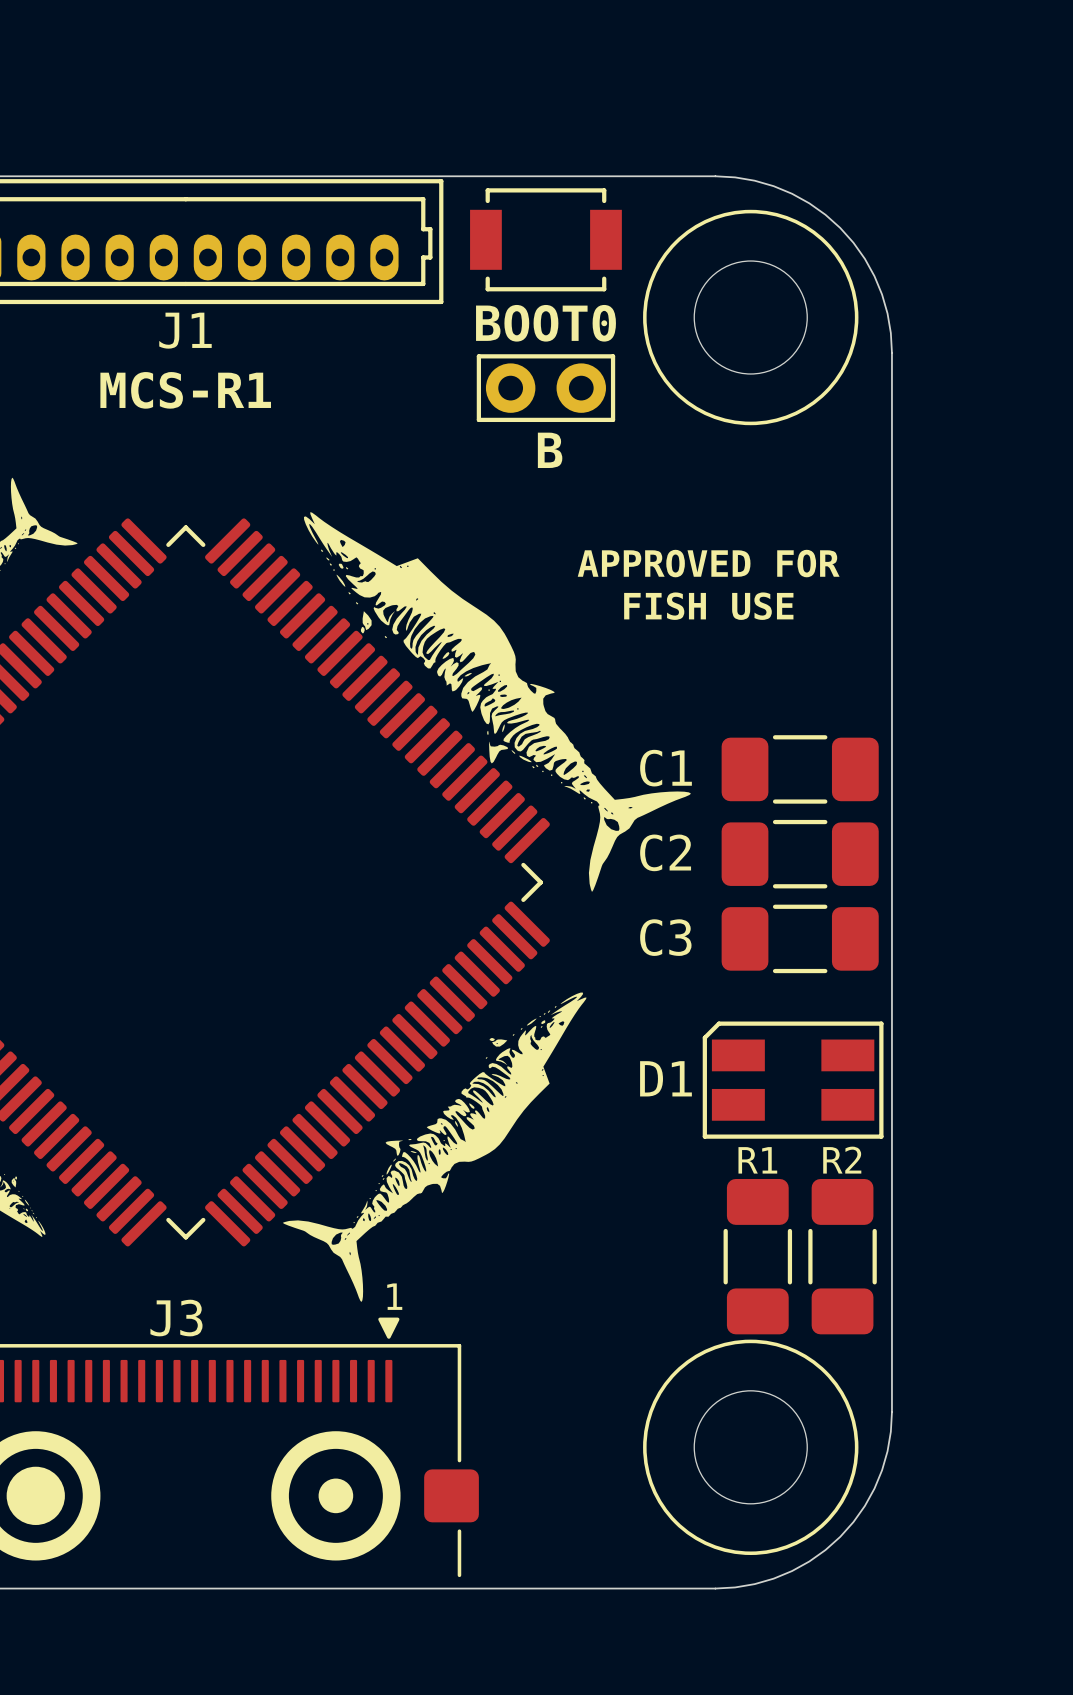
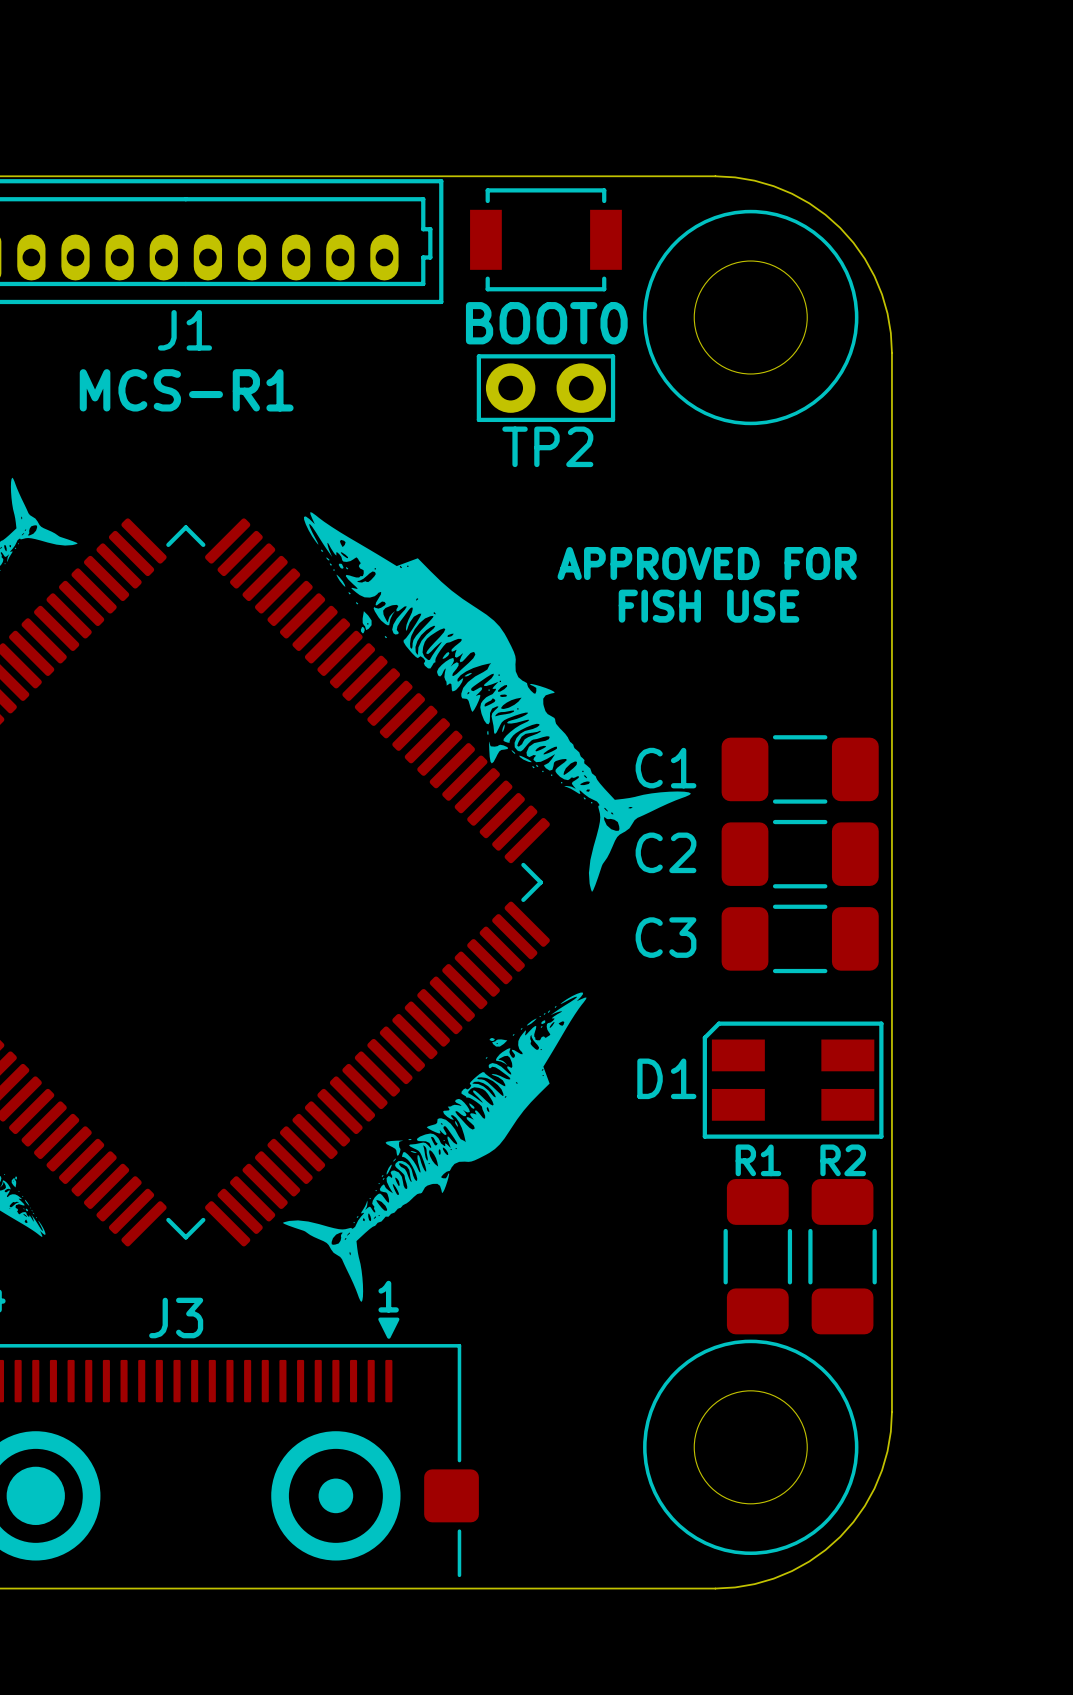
TP2 name: none -> TP2 (547, 446)
text: B (550, 450) -> none

